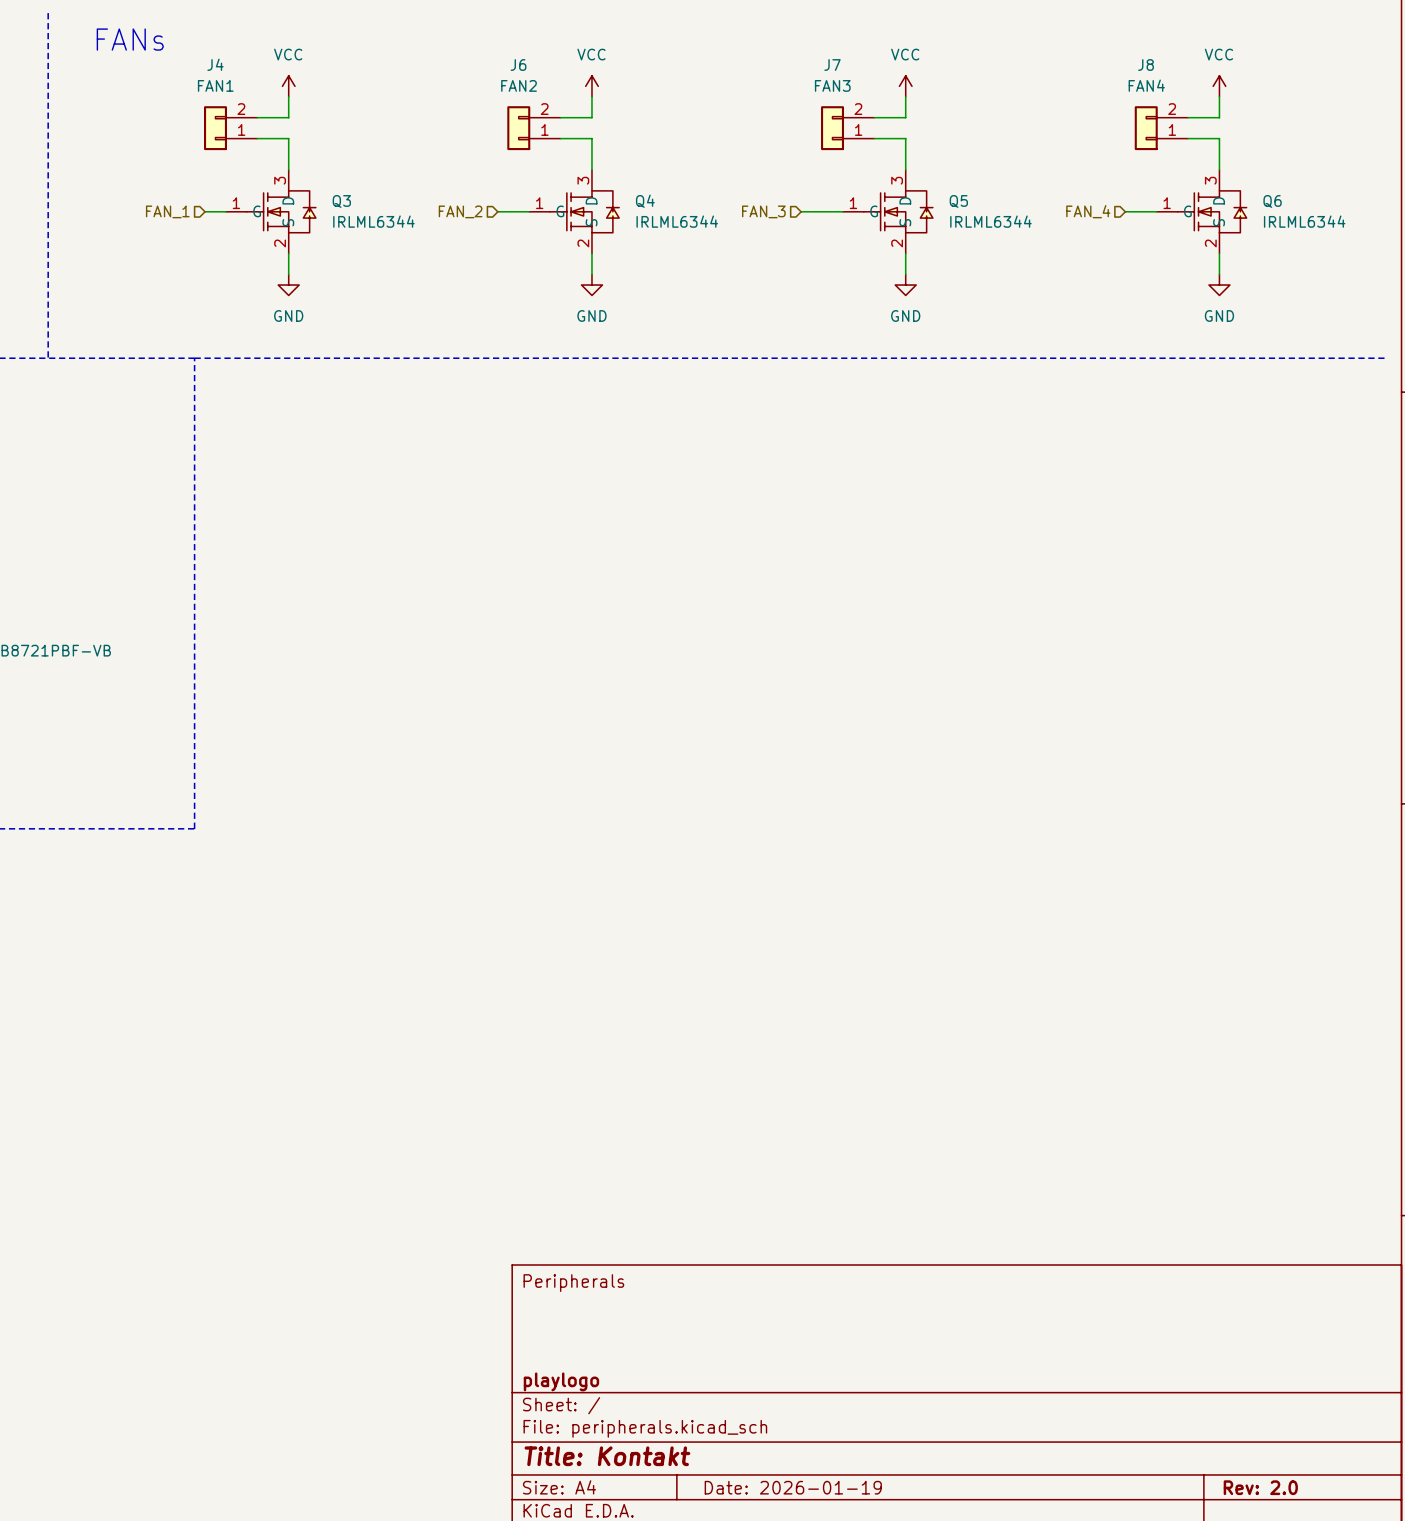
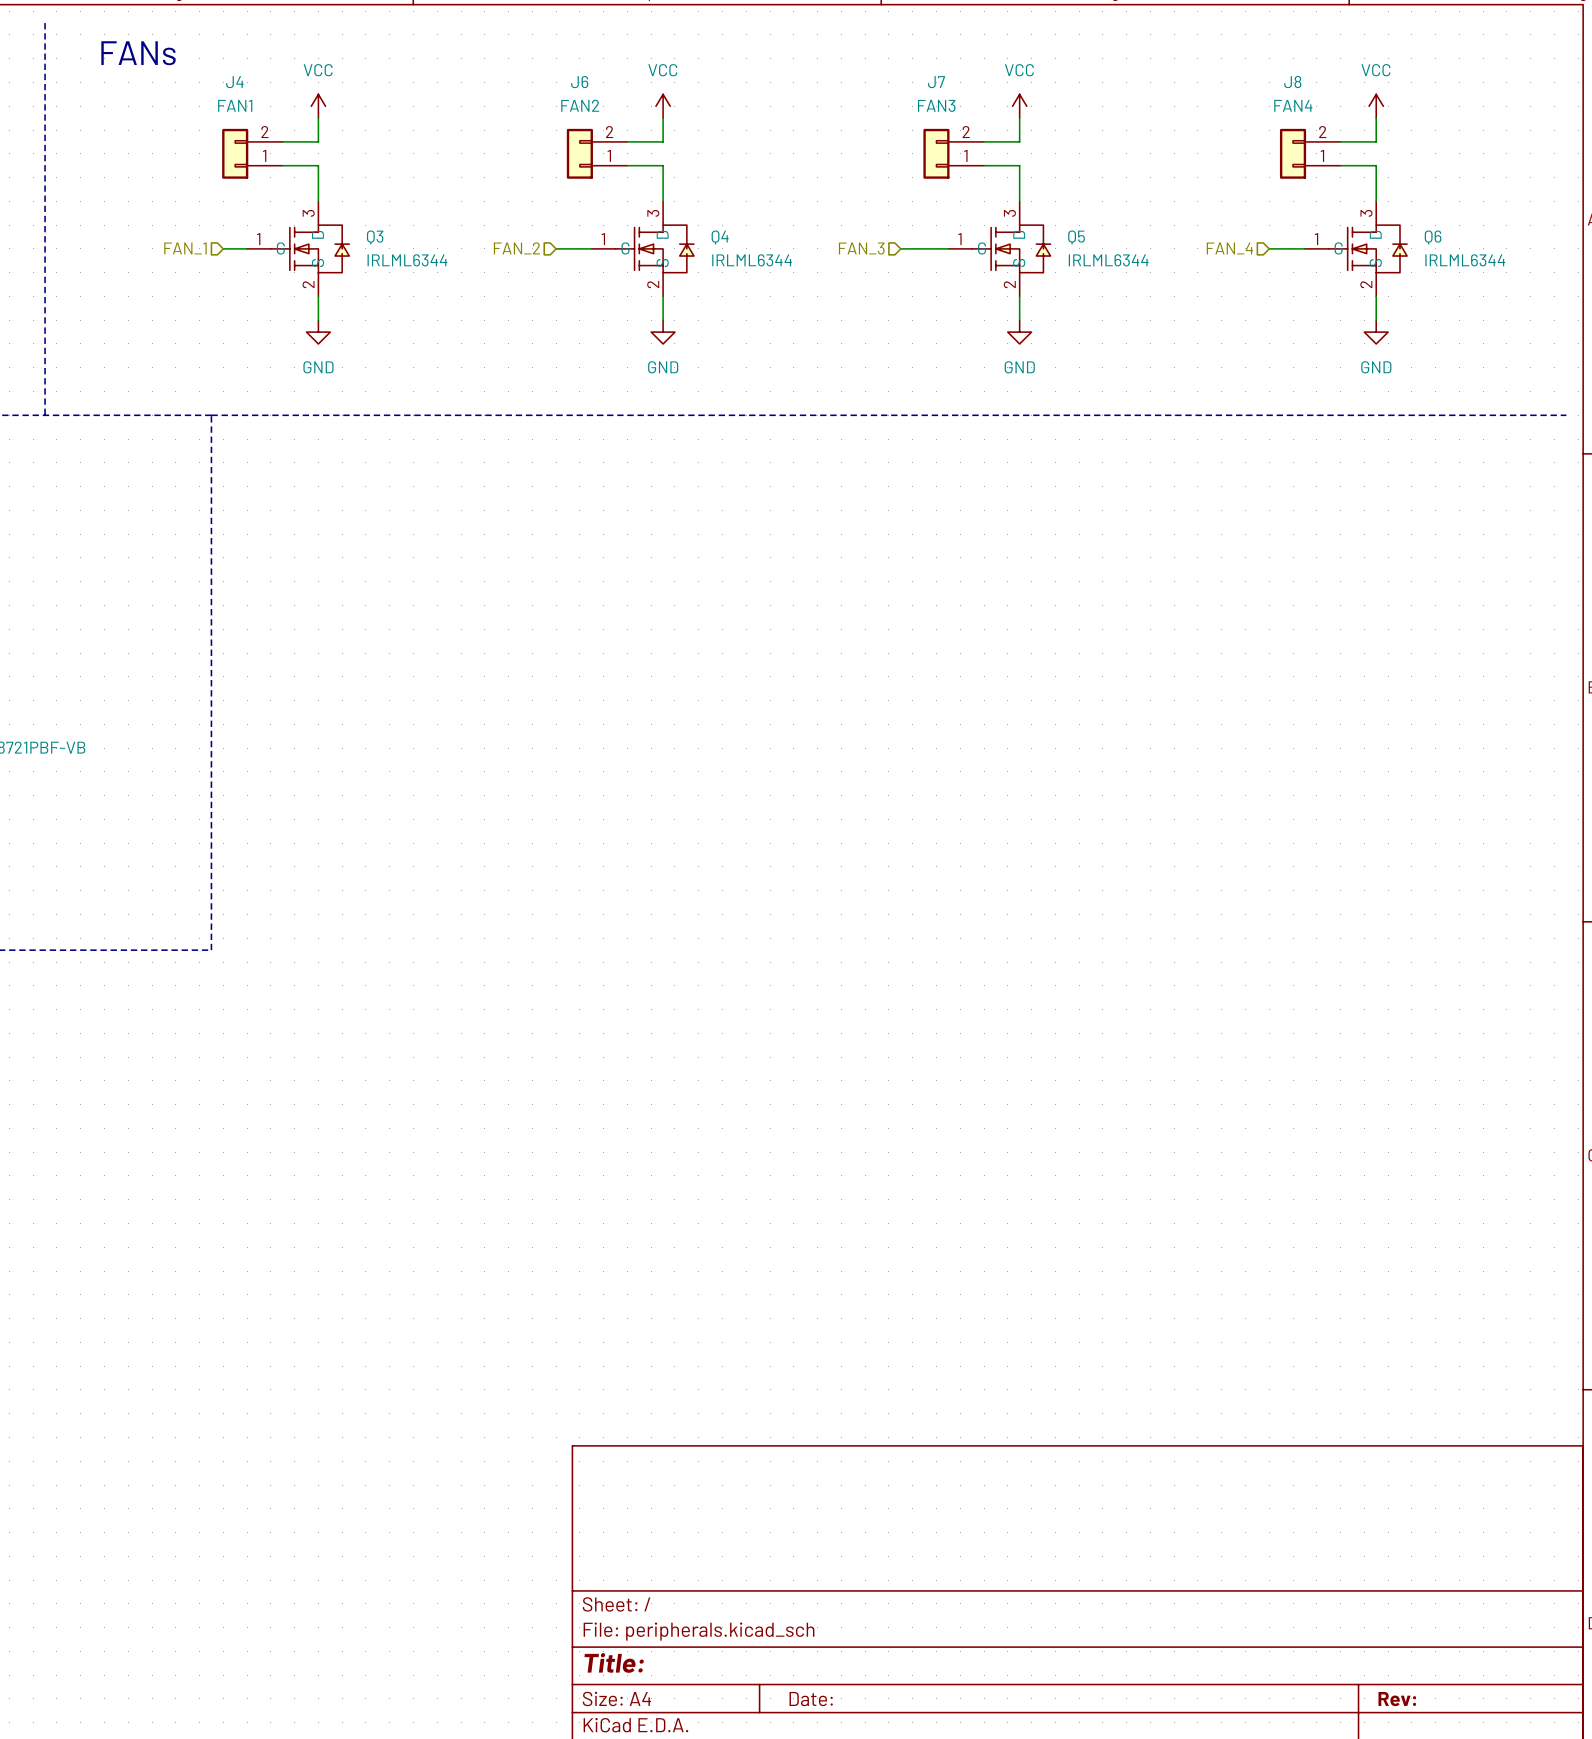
title block: Peripherals (573, 1283) -> none
title block: playlogo (561, 1381) -> none
title block: Title: Kontakt (607, 1456) -> Title: (614, 1662)
title block: Date: 2026-01-19 (793, 1487) -> Date: (811, 1699)
title block: Rev: 2.0 (1260, 1487) -> Rev: (1397, 1699)

